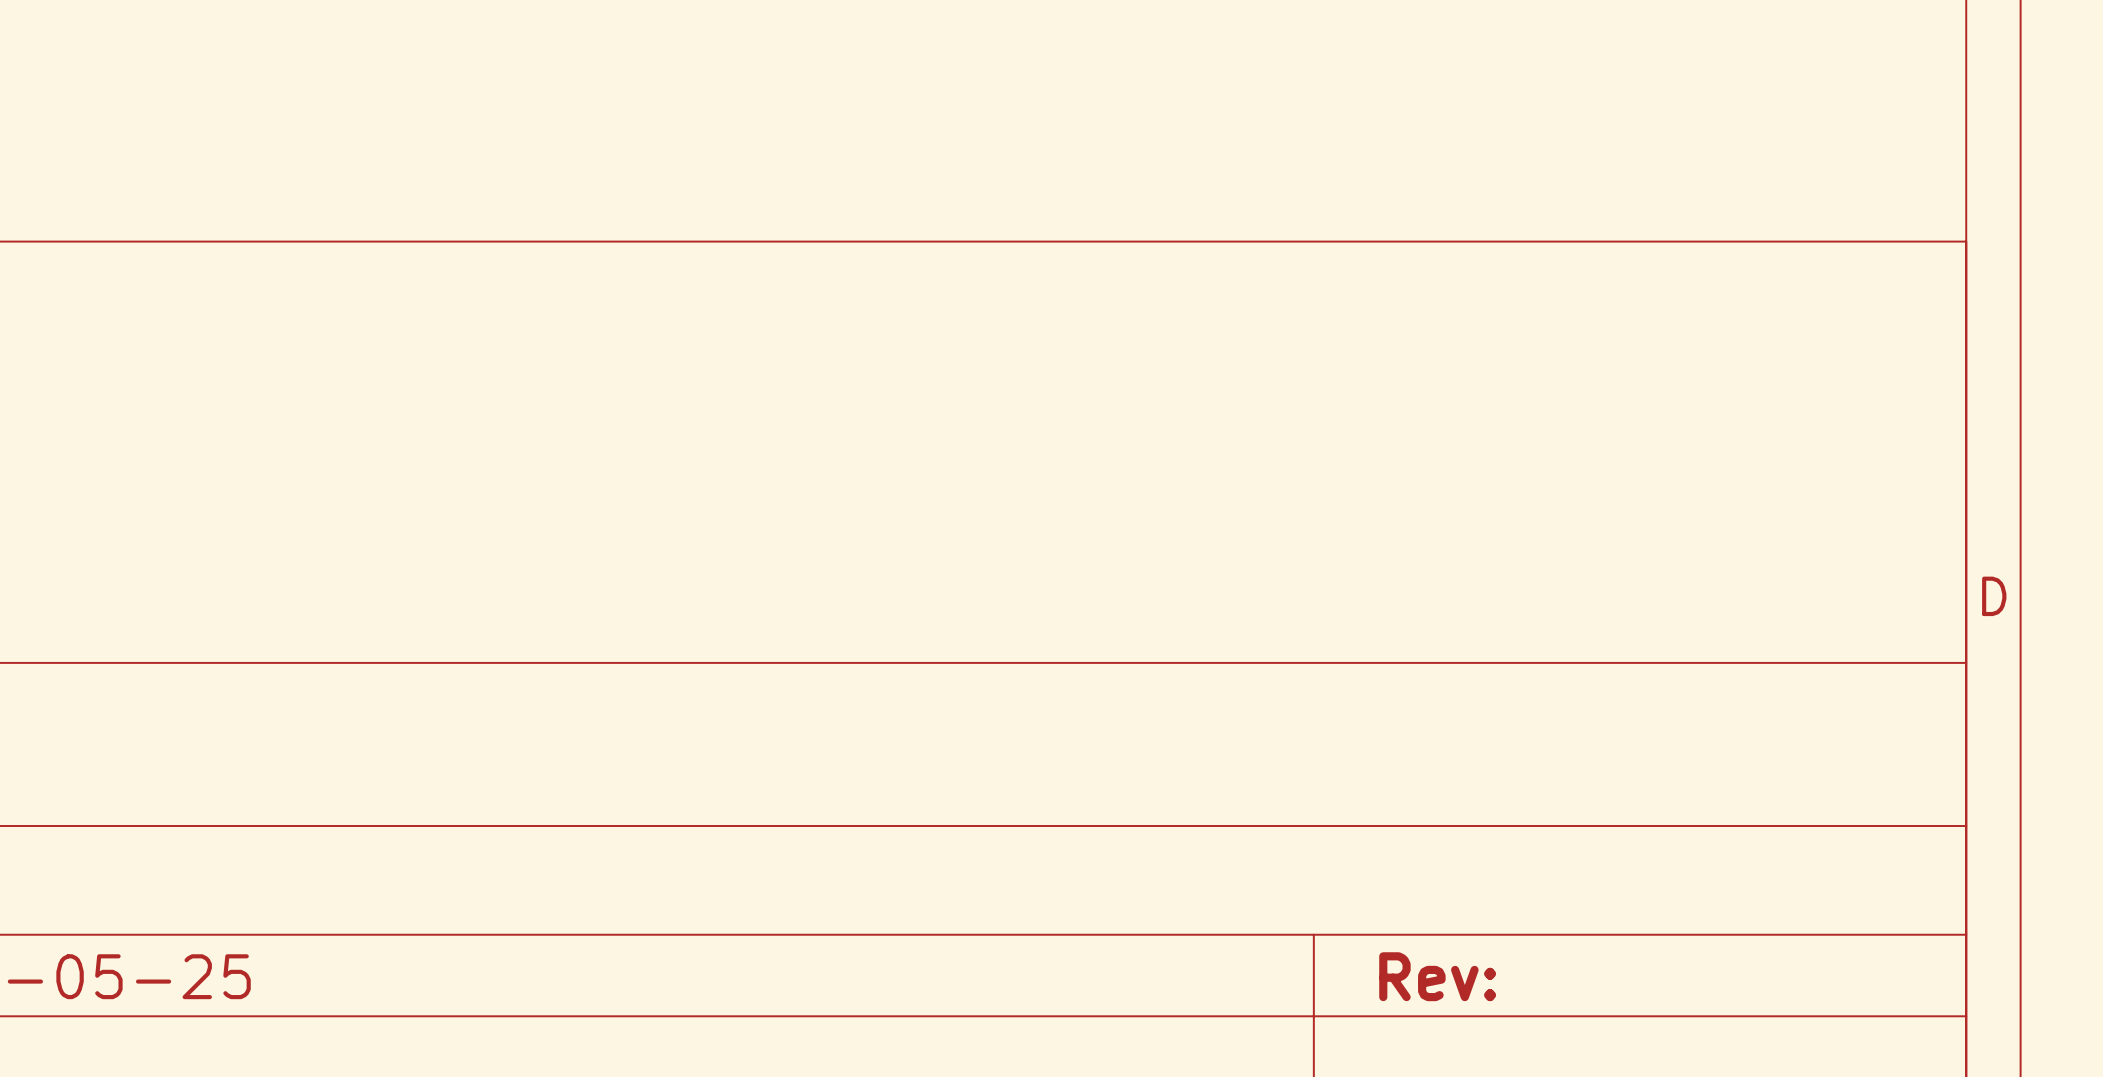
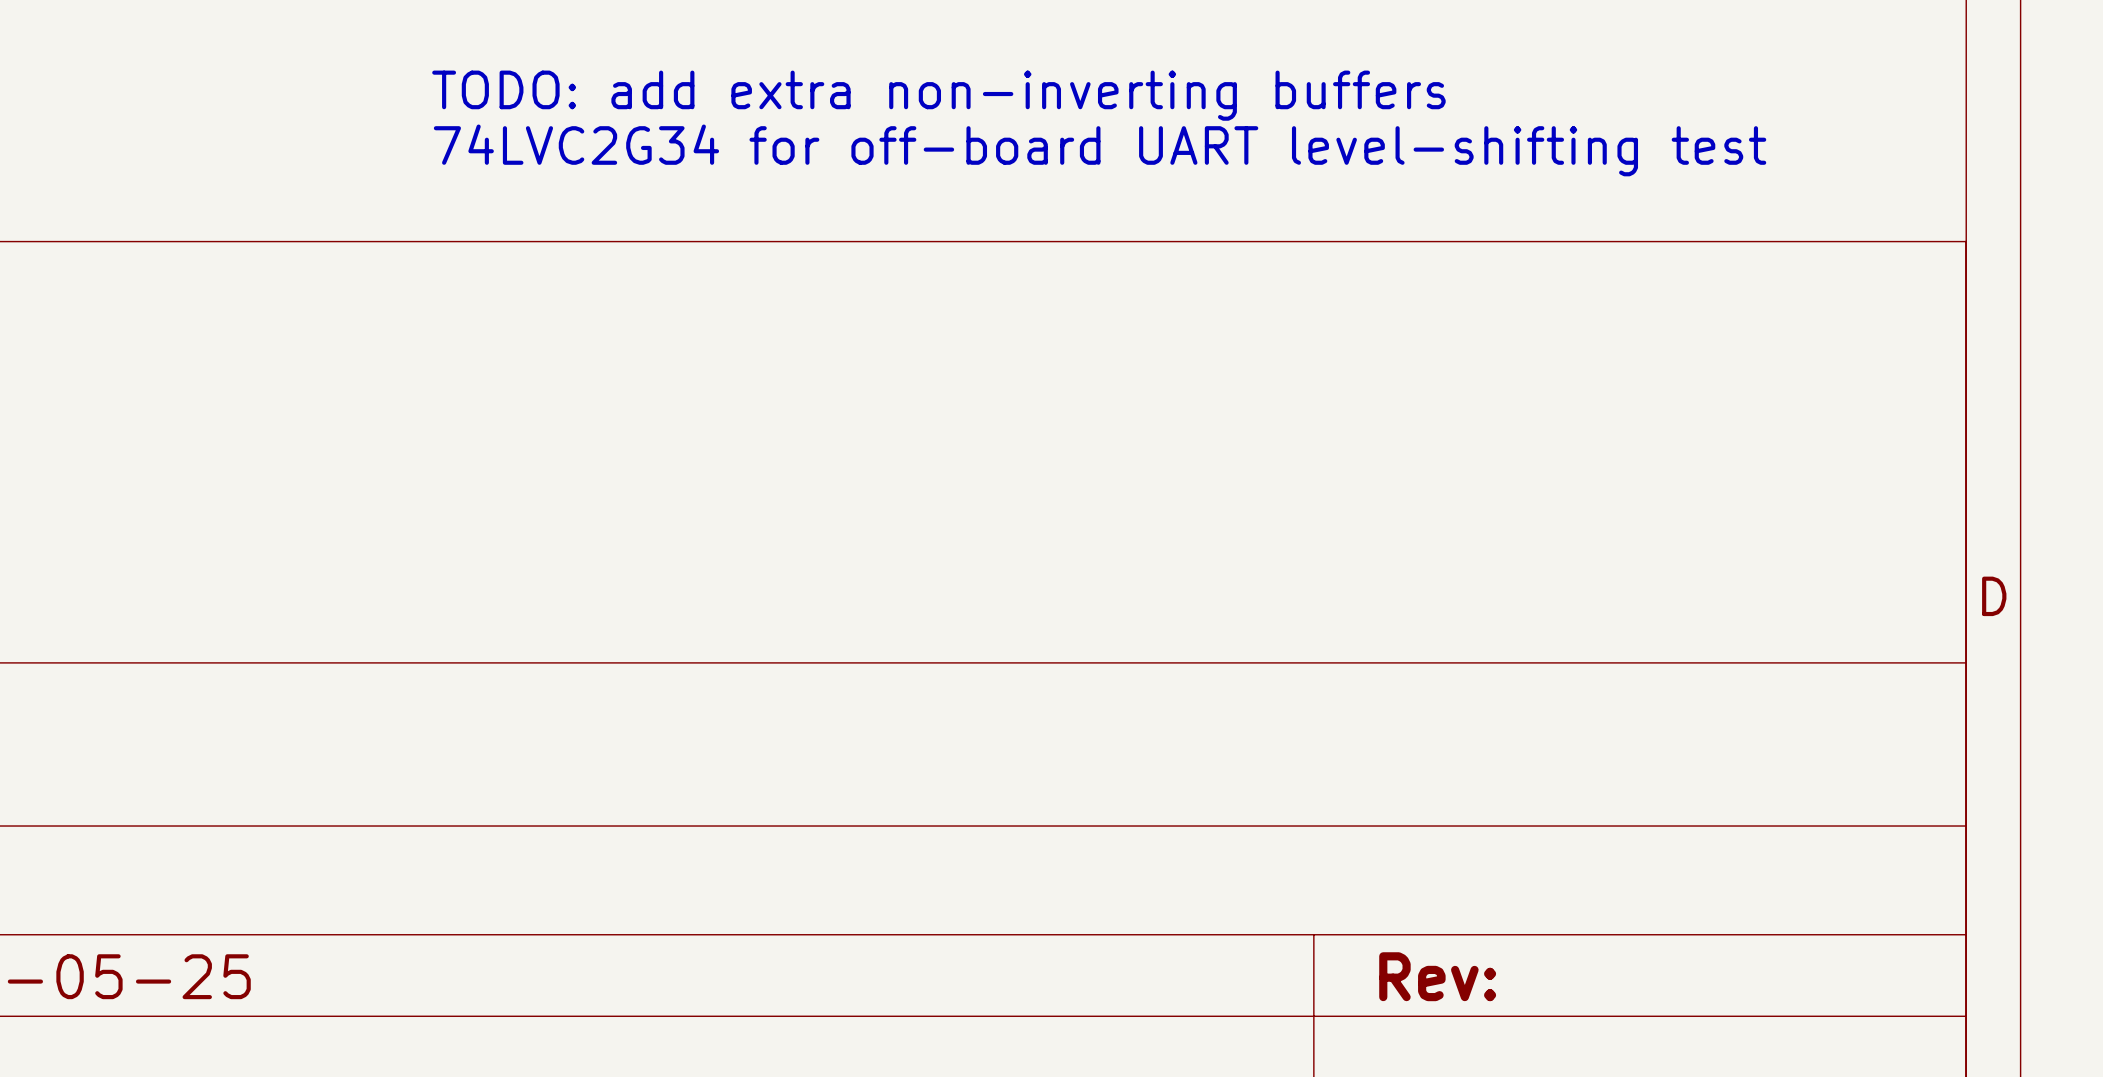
text: none -> TODO: add extra non-inverting buffers (938, 95)
text: none -> 74LVC2G34 for off-board UART level-shifting test (1100, 150)

